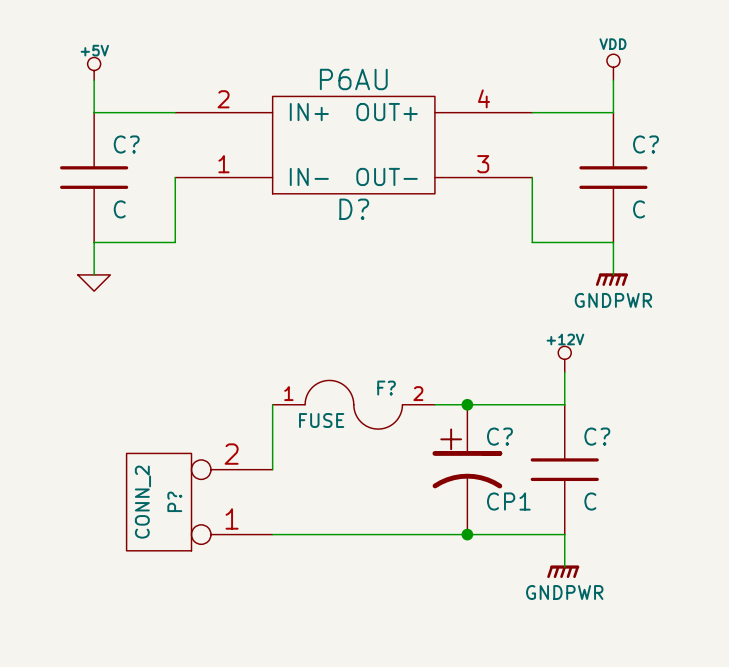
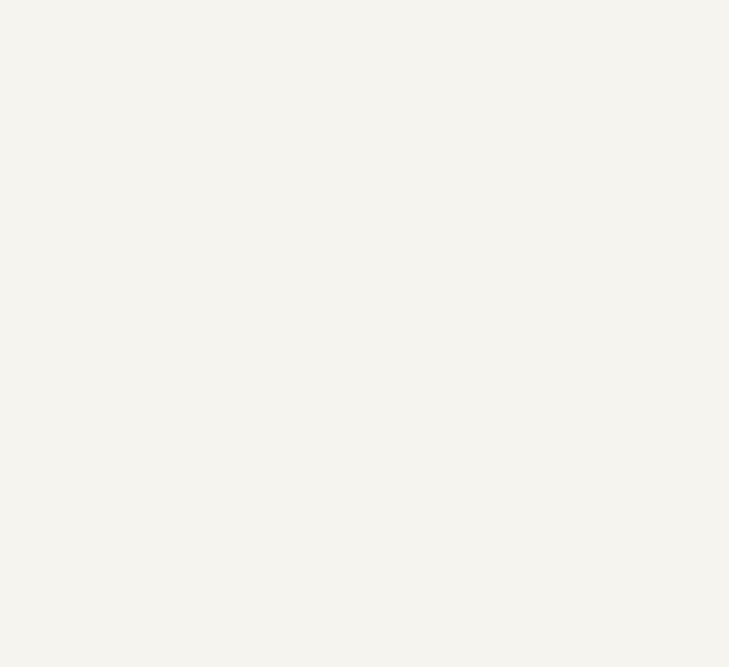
power symbol: VDD (613, 67) -> none
power symbol: +5V (94, 68) -> none
wire: (94, 80) (94, 112) (175, 112) -> none
wire: (613, 80) (613, 112) (532, 112) -> none
D?: P6AU (353, 145) -> none
C?: C (94, 177) -> none
wire: (175, 177) (175, 242) (94, 242) (94, 274) -> none
wire: (532, 177) (532, 242) (613, 242) (613, 274) -> none
C?: C (613, 177) -> none
power symbol: GNDPWR (611, 279) -> none
power symbol: (94, 283) -> none
power symbol: +12V (564, 359) -> none
wire: (564, 372) (564, 404) (434, 404) -> none
wire: (272, 404) (272, 469) -> none
F?: FUSE (353, 404) -> none
junction: (467, 404) -> none
C?: CP1 (467, 469) -> none
C?: C (564, 469) -> none
P?: CONN_2 (199, 502) -> none
wire: (272, 534) (564, 534) (564, 567) -> none
junction: (467, 534) -> none
power symbol: GNDPWR (563, 571) -> none

